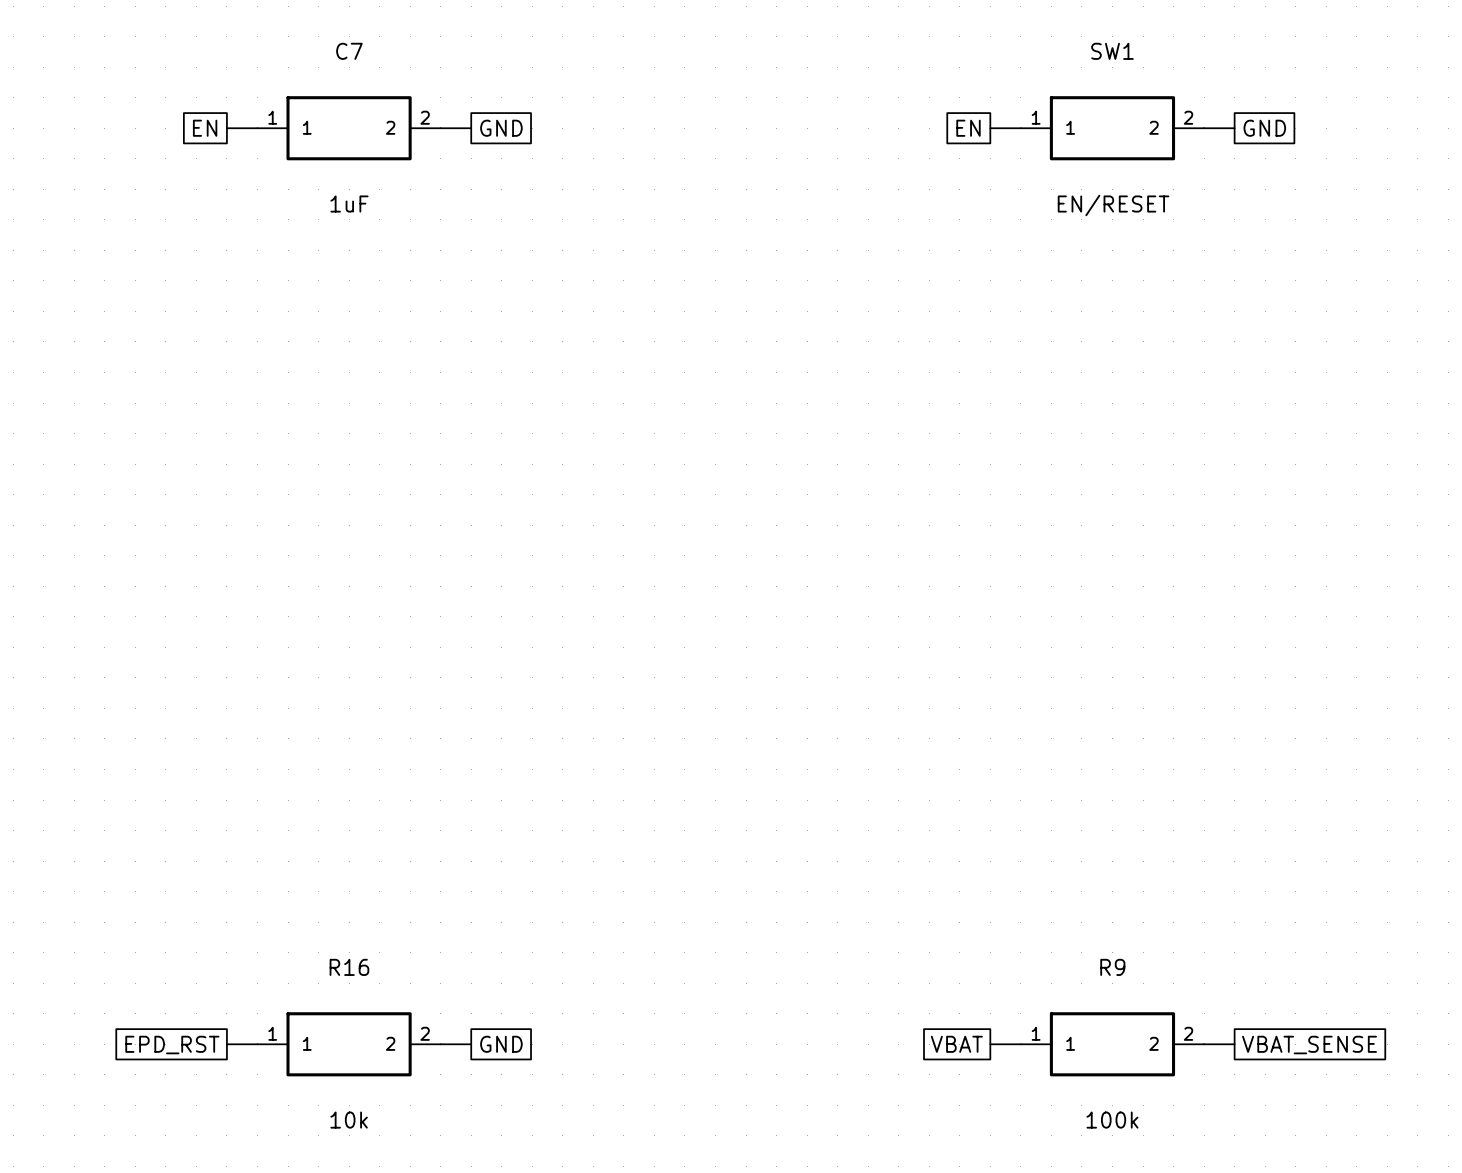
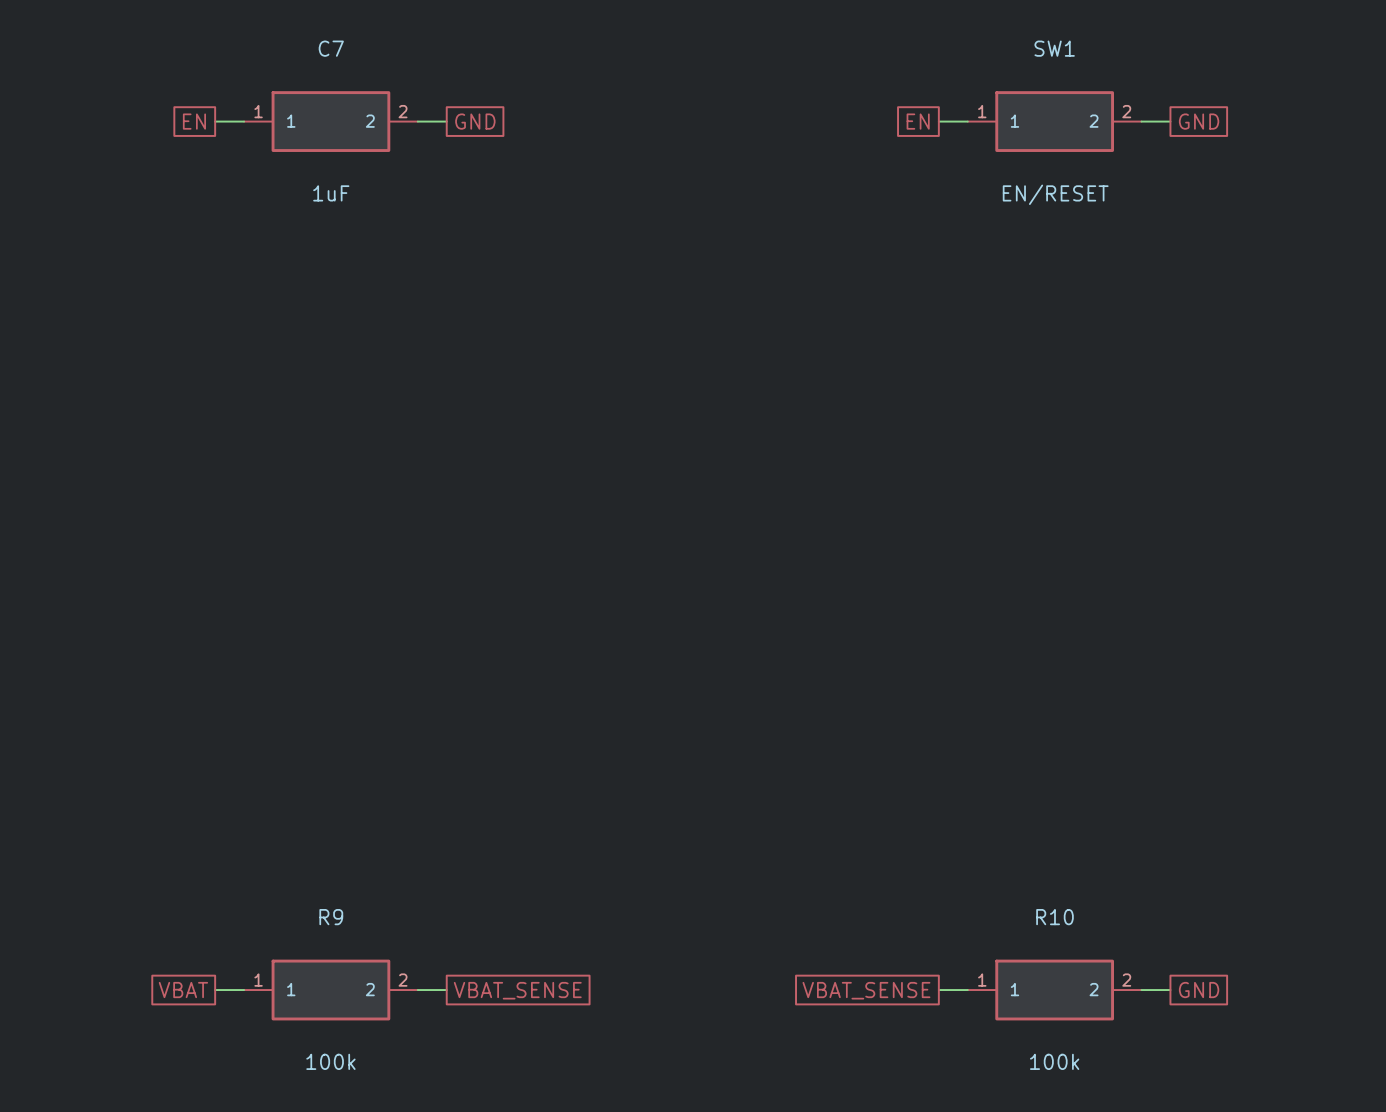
R16 name: R16 (349, 967) -> R9 (331, 917)
R9 name: R9 (1112, 967) -> R10 (1054, 917)
global label: GND (501, 1044) -> VBAT_SENSE (517, 990)
global label: VBAT (956, 1044) -> VBAT_SENSE (866, 990)
global label: EPD_RST (172, 1045) -> VBAT (183, 990)
global label: VBAT_SENSE (1309, 1045) -> GND (1199, 990)
R16 value: 10k (349, 1120) -> 100k (330, 1061)

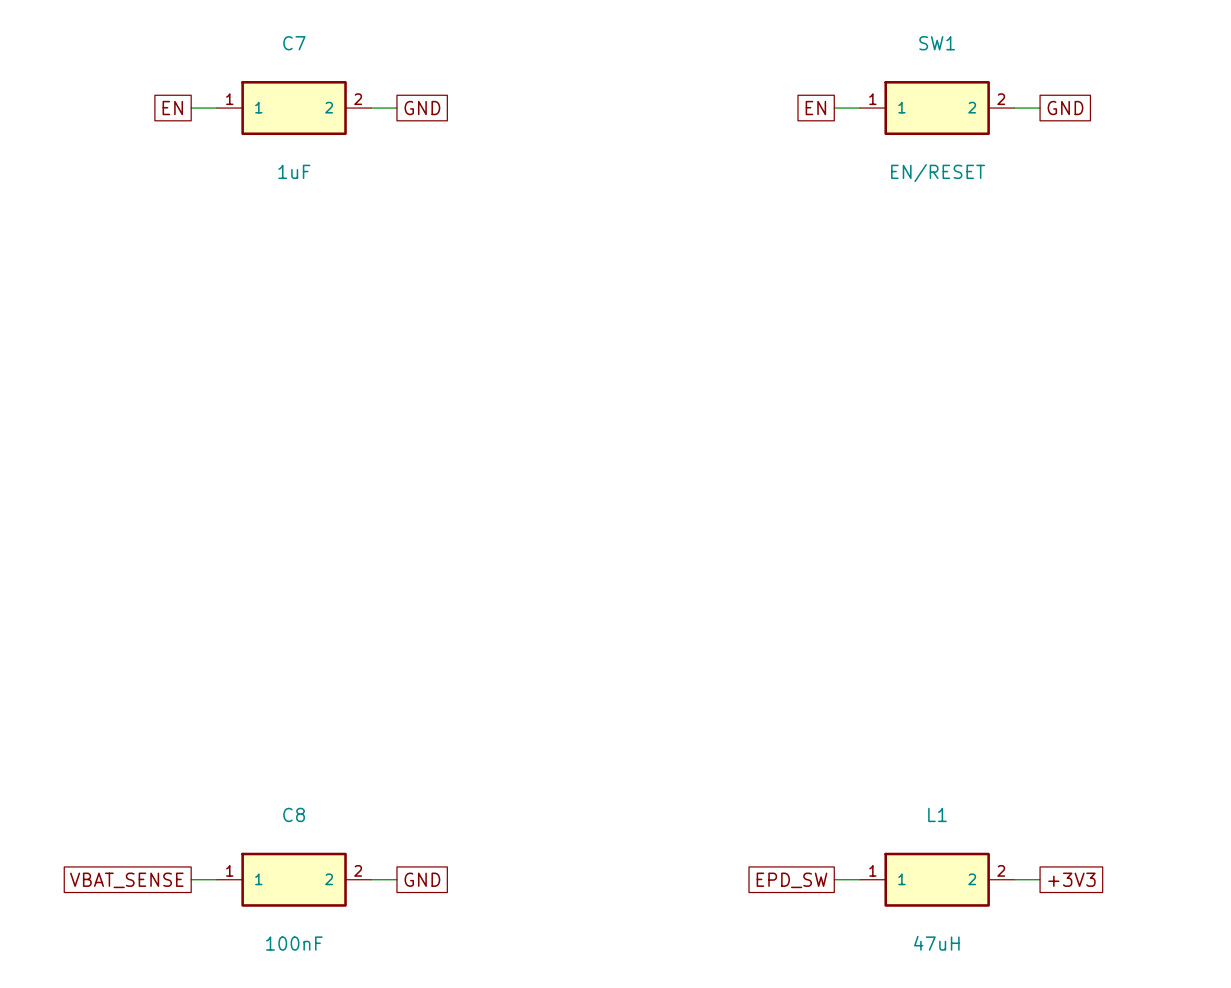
R9 name: R9 (331, 917) -> C8 (294, 814)
R10 name: R10 (1054, 917) -> L1 (937, 814)
global label: VBAT (183, 990) -> VBAT_SENSE (126, 880)
global label: VBAT_SENSE (517, 990) -> GND (422, 879)
global label: VBAT_SENSE (866, 990) -> EPD_SW (791, 880)
global label: GND (1199, 990) -> +3V3 (1071, 879)
R9 value: 100k (330, 1061) -> 100nF (294, 943)
R10 value: 100k (1054, 1061) -> 47uH (936, 943)

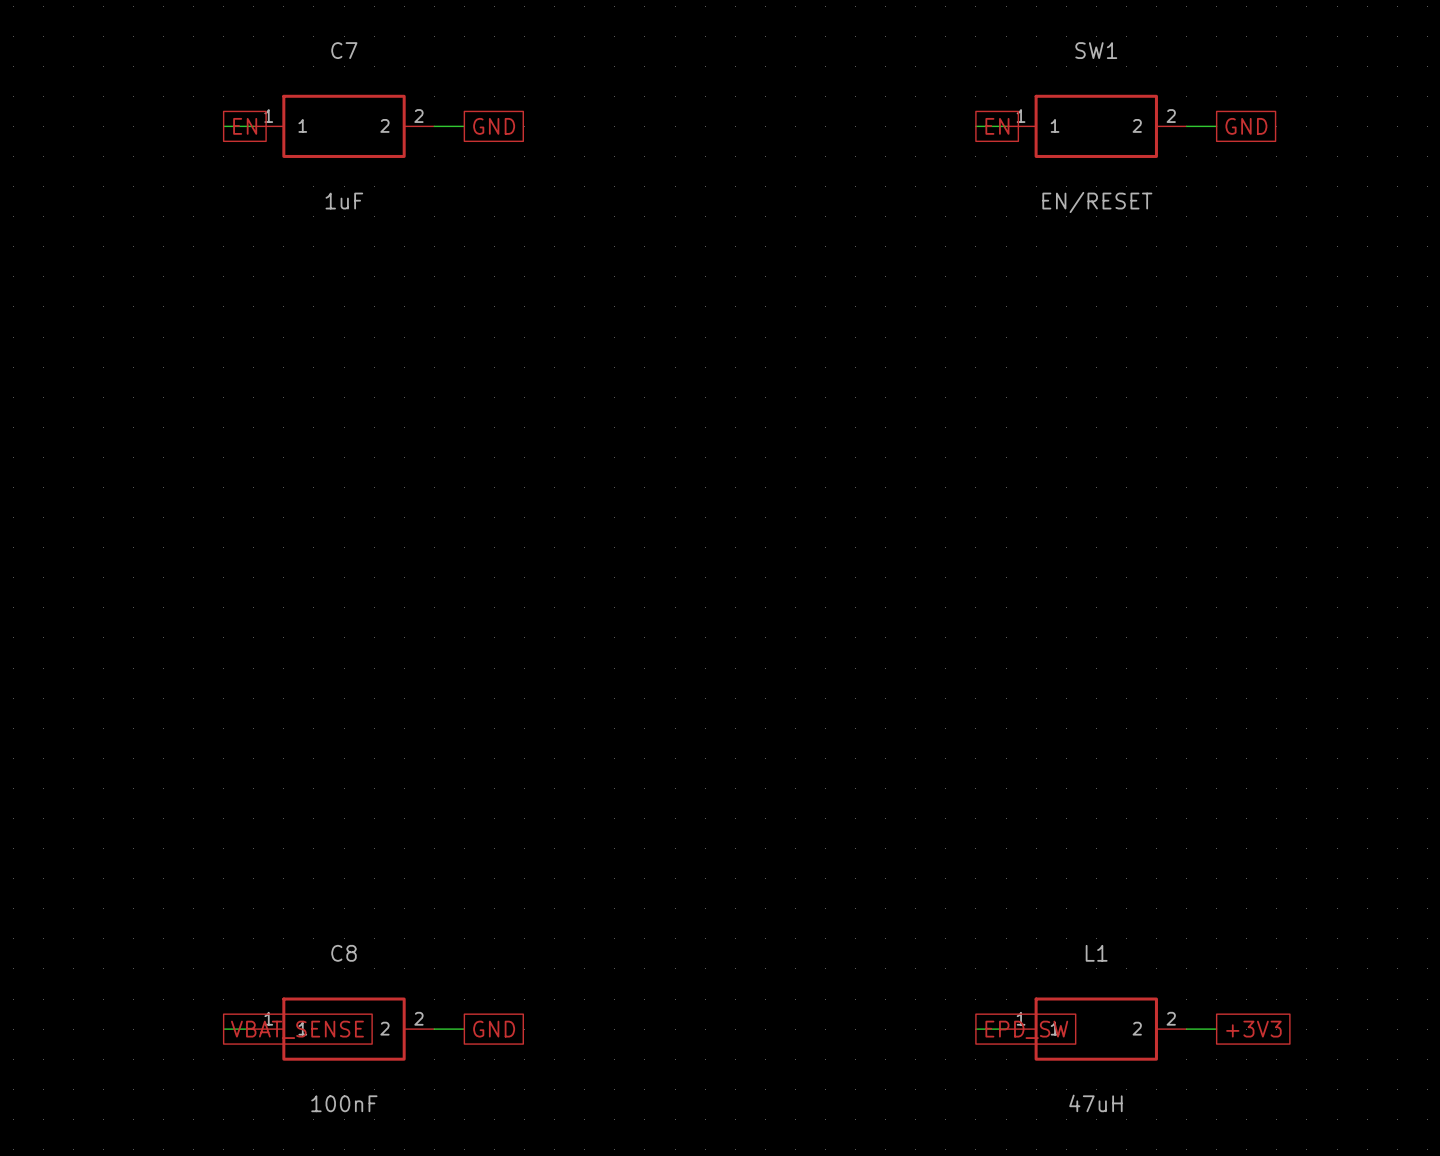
global label rotation: 0° (172, 108) -> 180° (245, 126)
global label rotation: 0° (815, 108) -> 180° (997, 126)
global label position: EN (815, 108) -> EN (997, 126)
global label rotation: 0° (126, 880) -> 180° (297, 1029)
global label rotation: 0° (791, 880) -> 180° (1026, 1029)
global label position: EPD_SW (791, 880) -> EPD_SW (1026, 1029)

